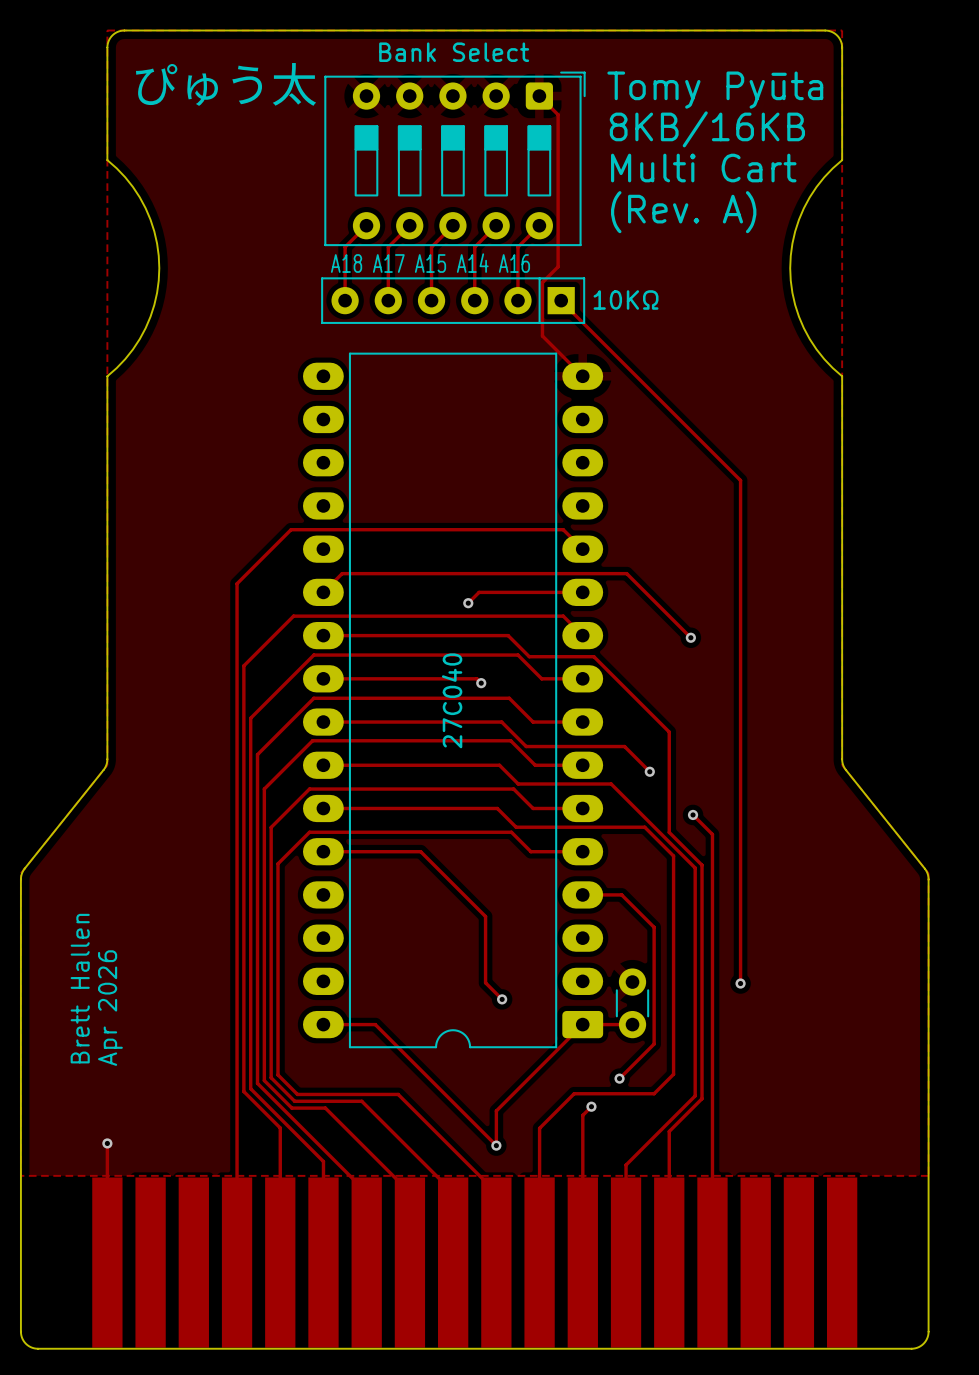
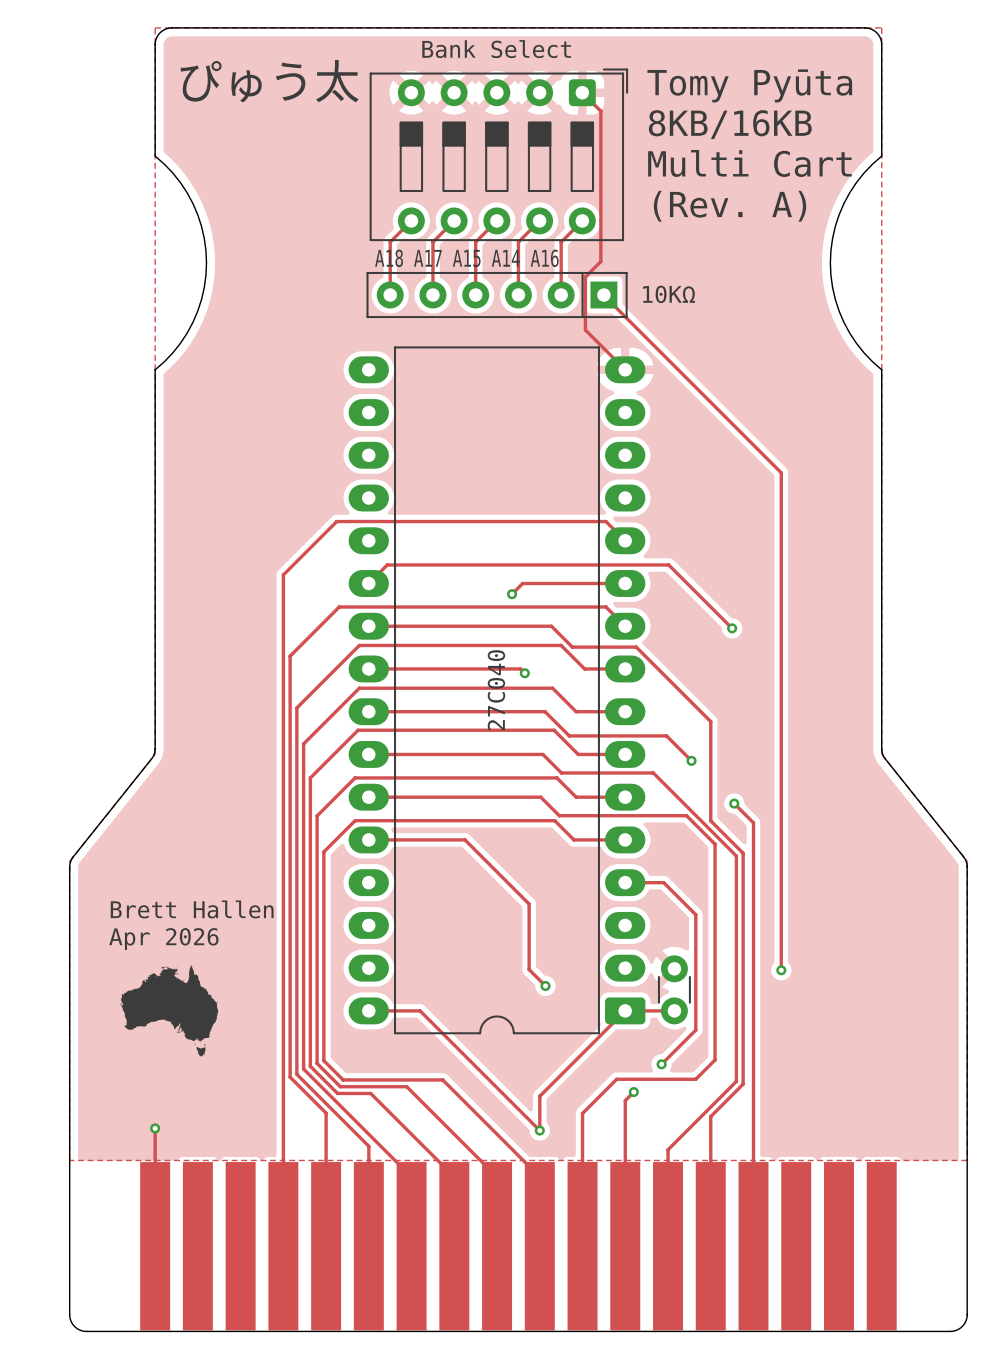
drawing: none -> [119, 964, 219, 1057]
text rotation: 0° (80, 988) -> 90° clockwise (192, 909)
text rotation: 0° (110, 1008) -> 90° clockwise (163, 939)

